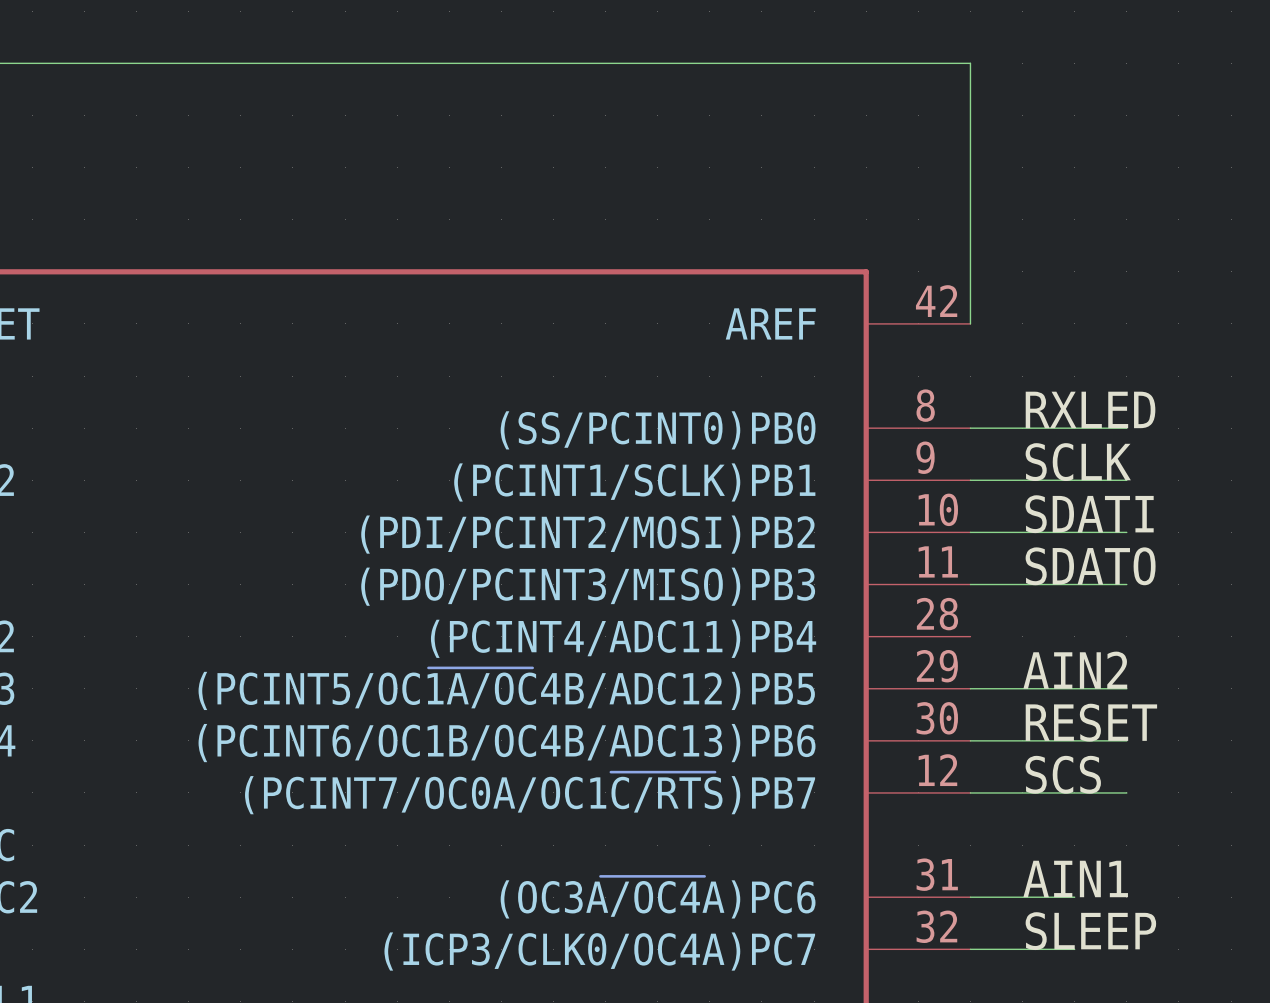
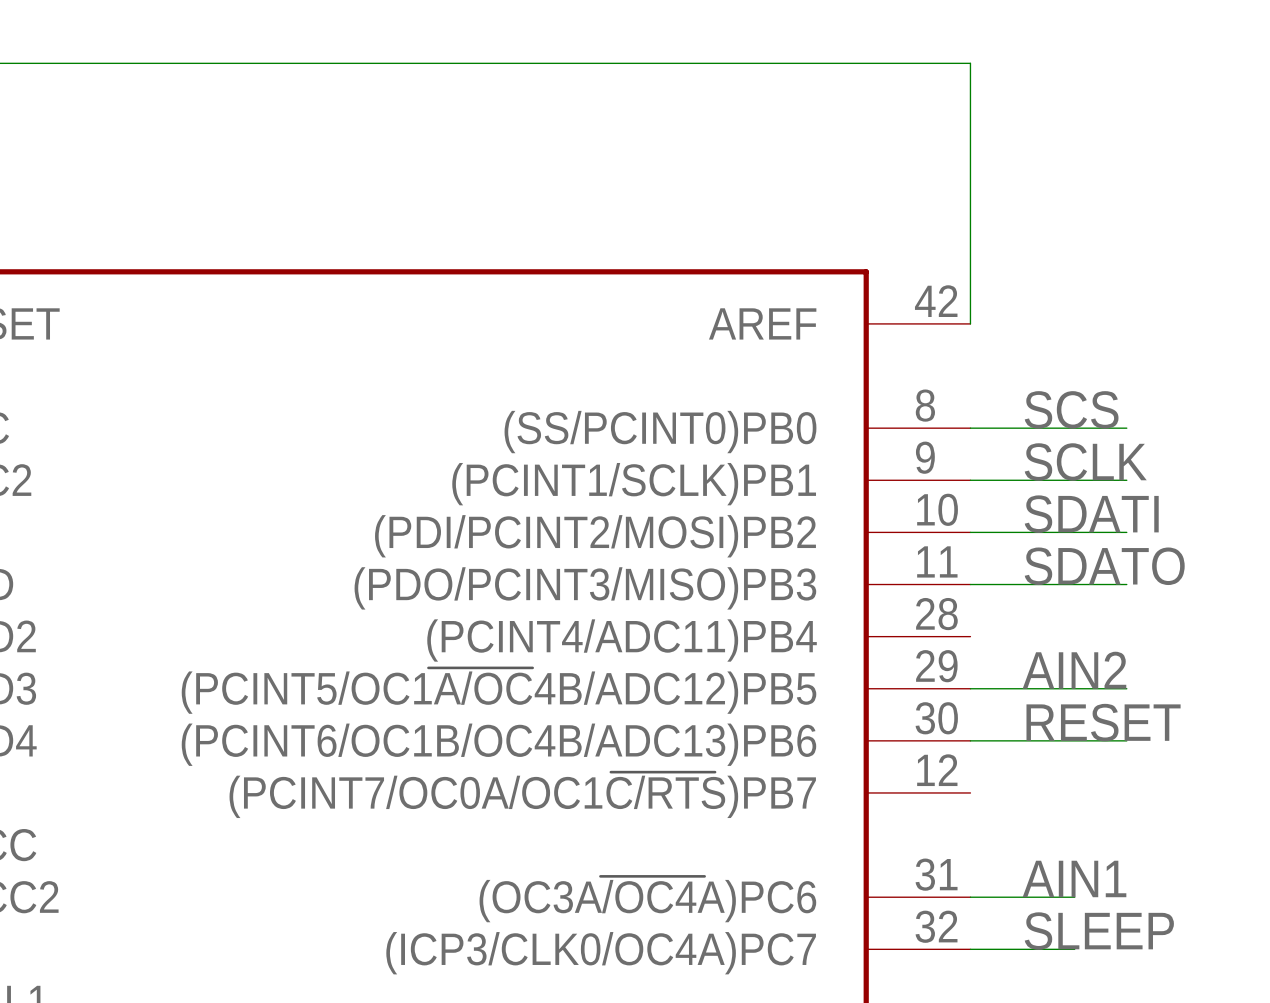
label: RXLED (1090, 409) -> SCS (1071, 409)
label: SCS (1063, 774) -> none
wire: (970, 792) (1126, 792) -> none

